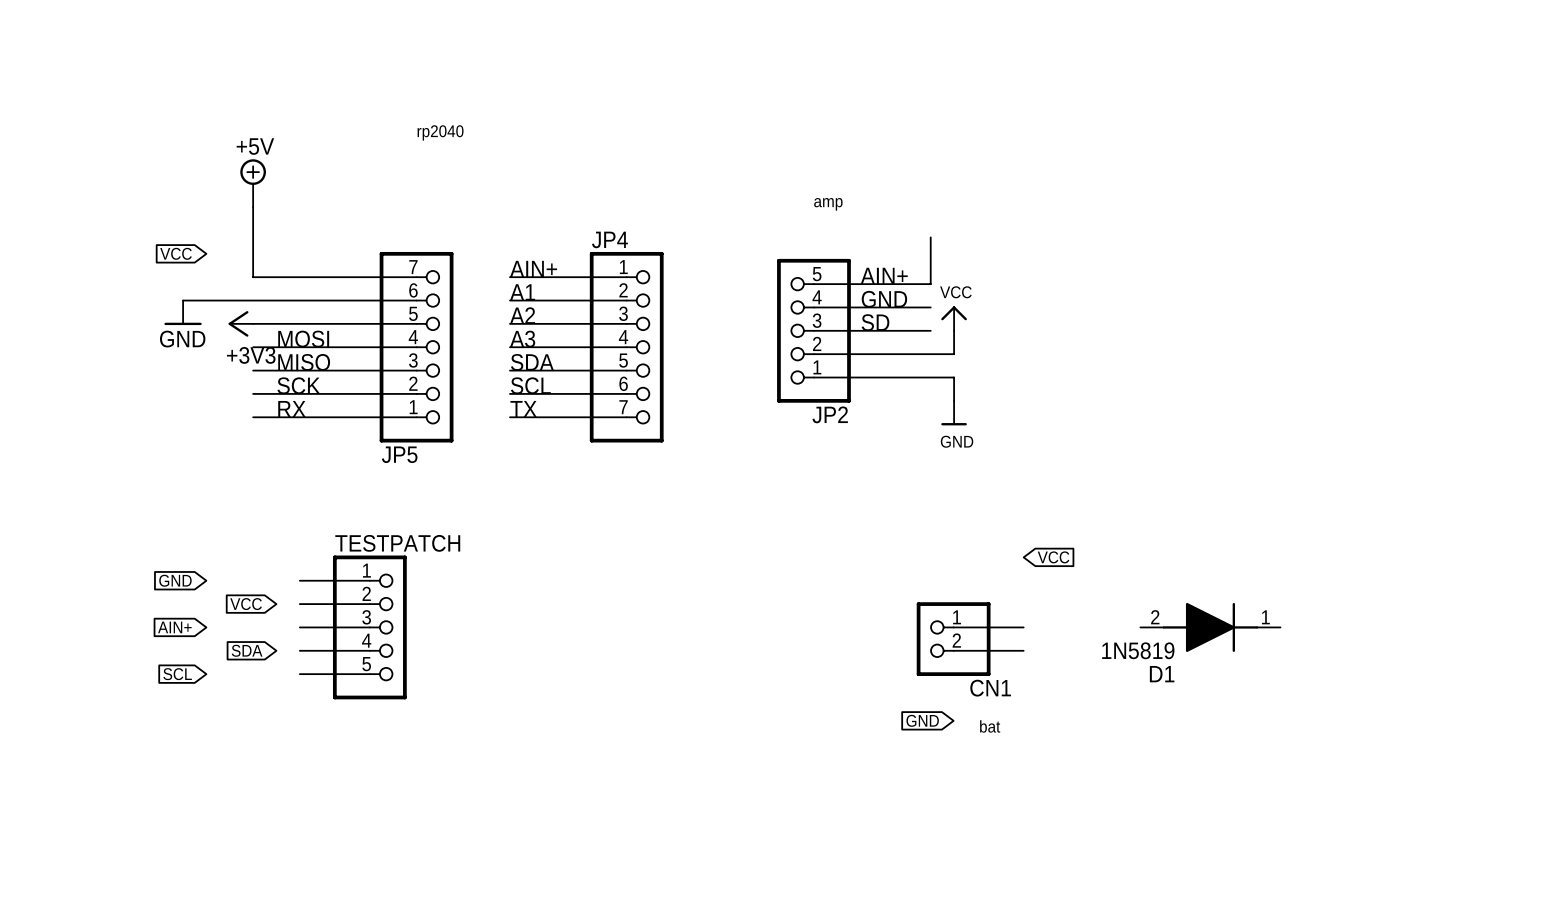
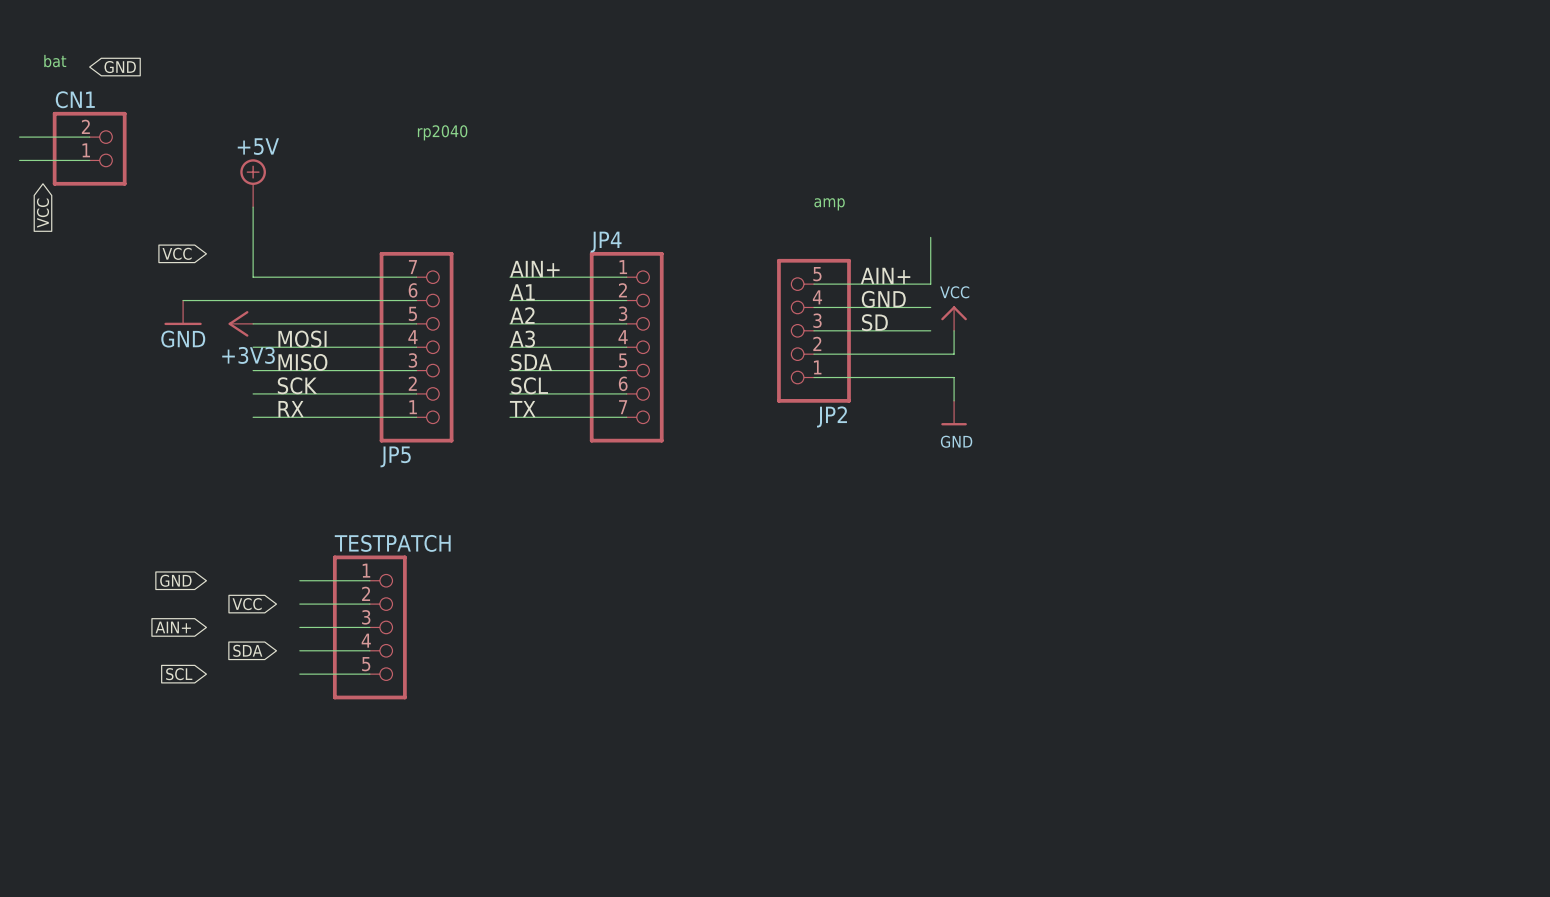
text: none -> bat (55, 61)
global label: none -> GND (120, 67)
wire: none -> (19, 137) (89, 137)
wire: none -> (19, 160) (89, 160)
global label: none -> VCC (42, 213)
global label: VCC (1053, 557) -> none
wire: (953, 627) (1023, 627) -> none
D1: 1N5819 (1210, 627) -> none
CN1 rotation: 0° (953, 639) -> 180° (89, 148)
CN1 position: (953, 639) -> (89, 148)
wire: (953, 650) (1023, 650) -> none
CN1 name position: CN1 (990, 688) -> CN1 (75, 99)
global label: GND (922, 720) -> none
text: bat (990, 726) -> none

